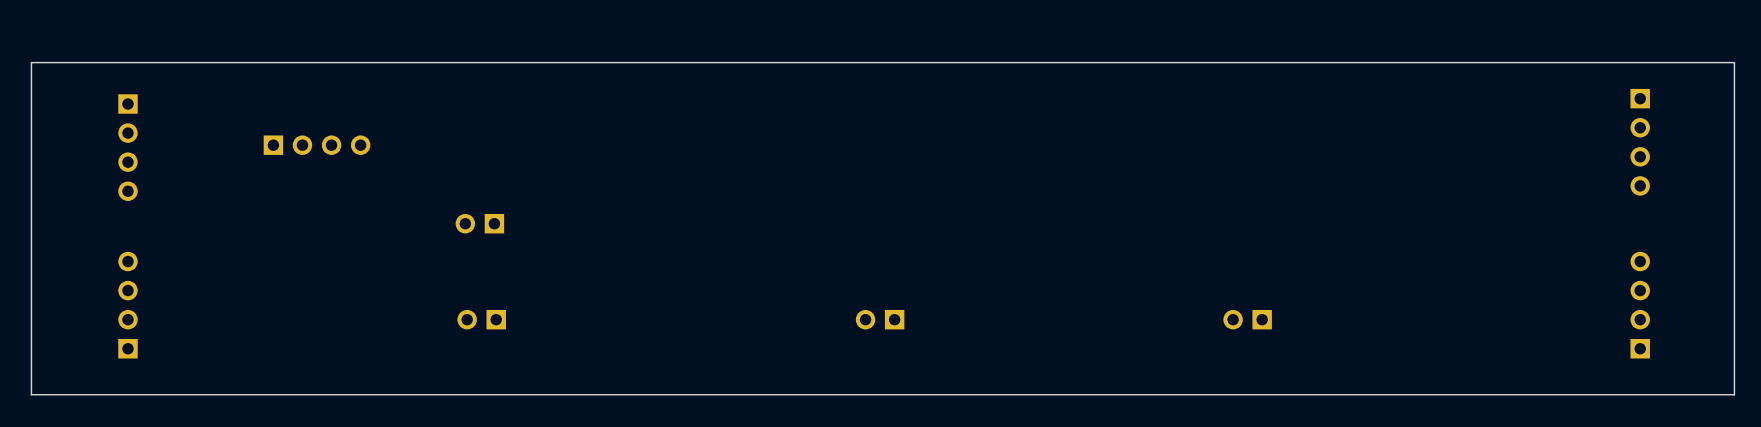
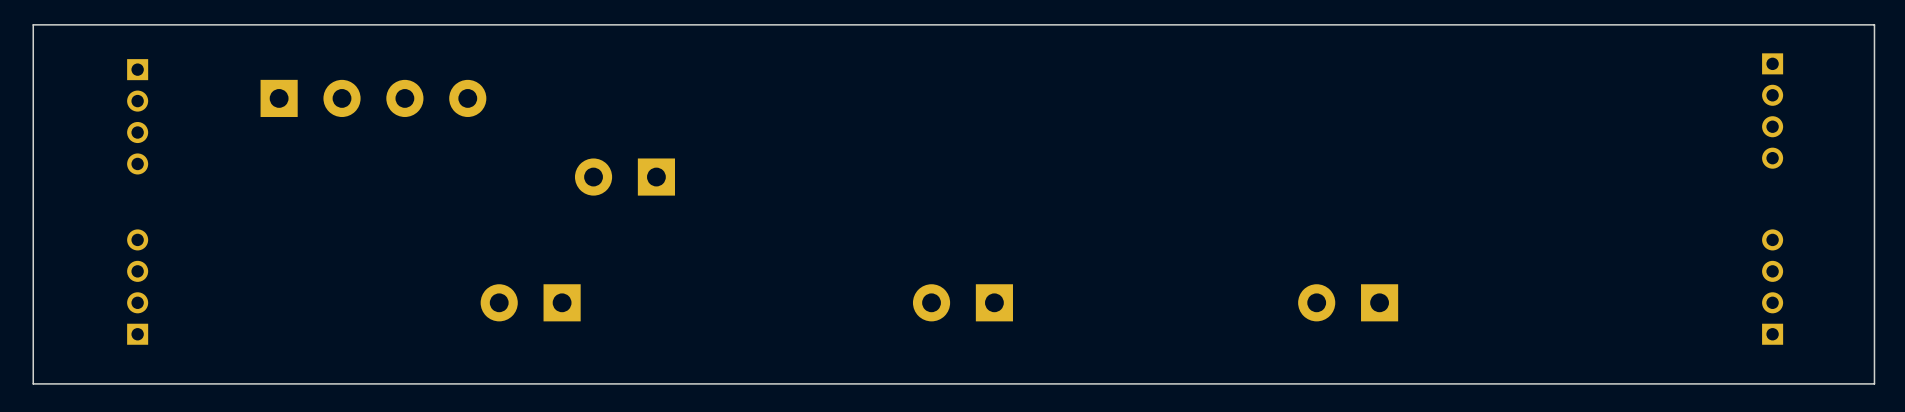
part: none -> (373, 98)
part: (317, 145) -> none
part: none -> (624, 177)
part: (479, 223) -> none
part footprint: [457, 309, 506, 330] -> [480, 284, 581, 322]
part footprint: [855, 309, 905, 330] -> [912, 284, 1013, 322]
part footprint: [1223, 309, 1272, 330] -> [1298, 284, 1399, 322]

